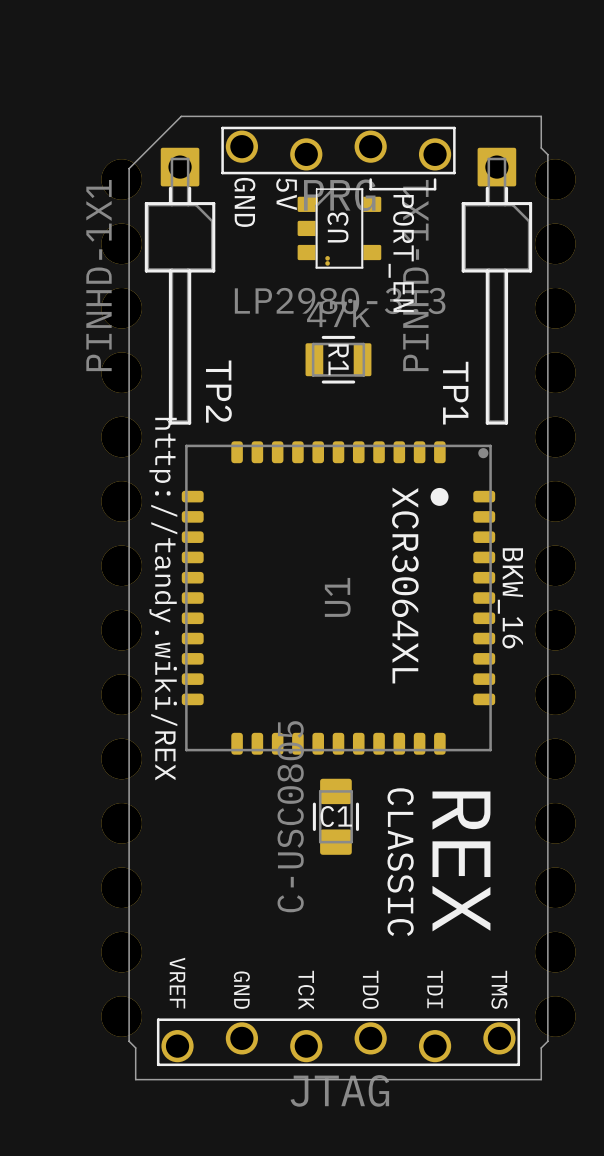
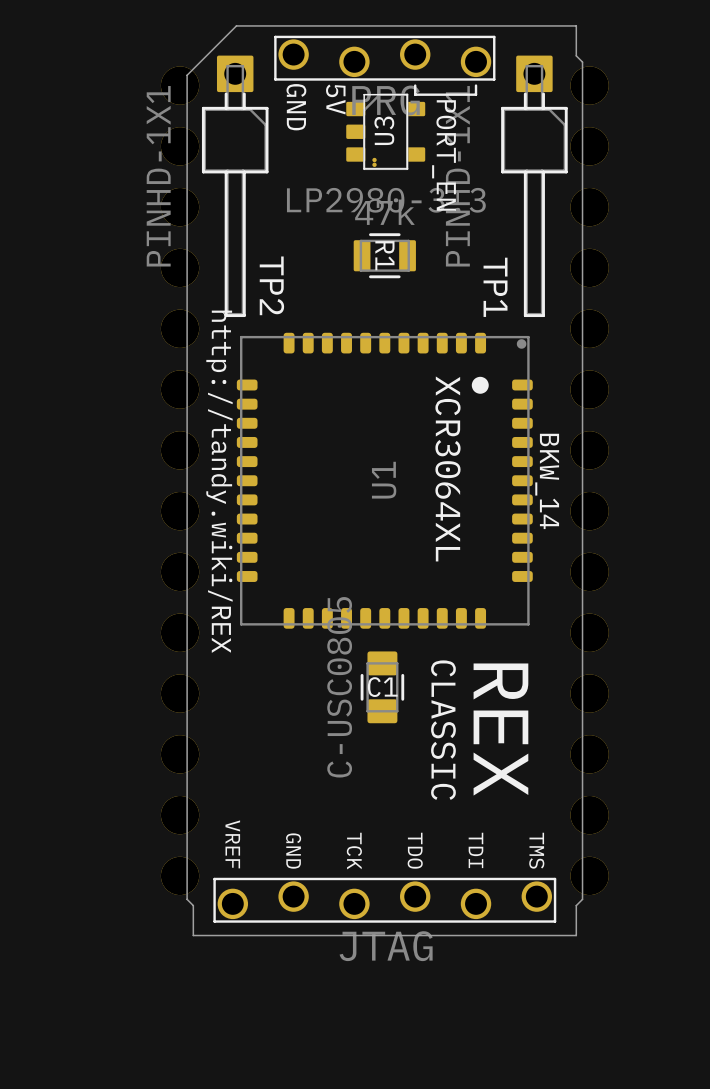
text: BKW_16 (510, 598) -> BKW_14 (547, 481)

